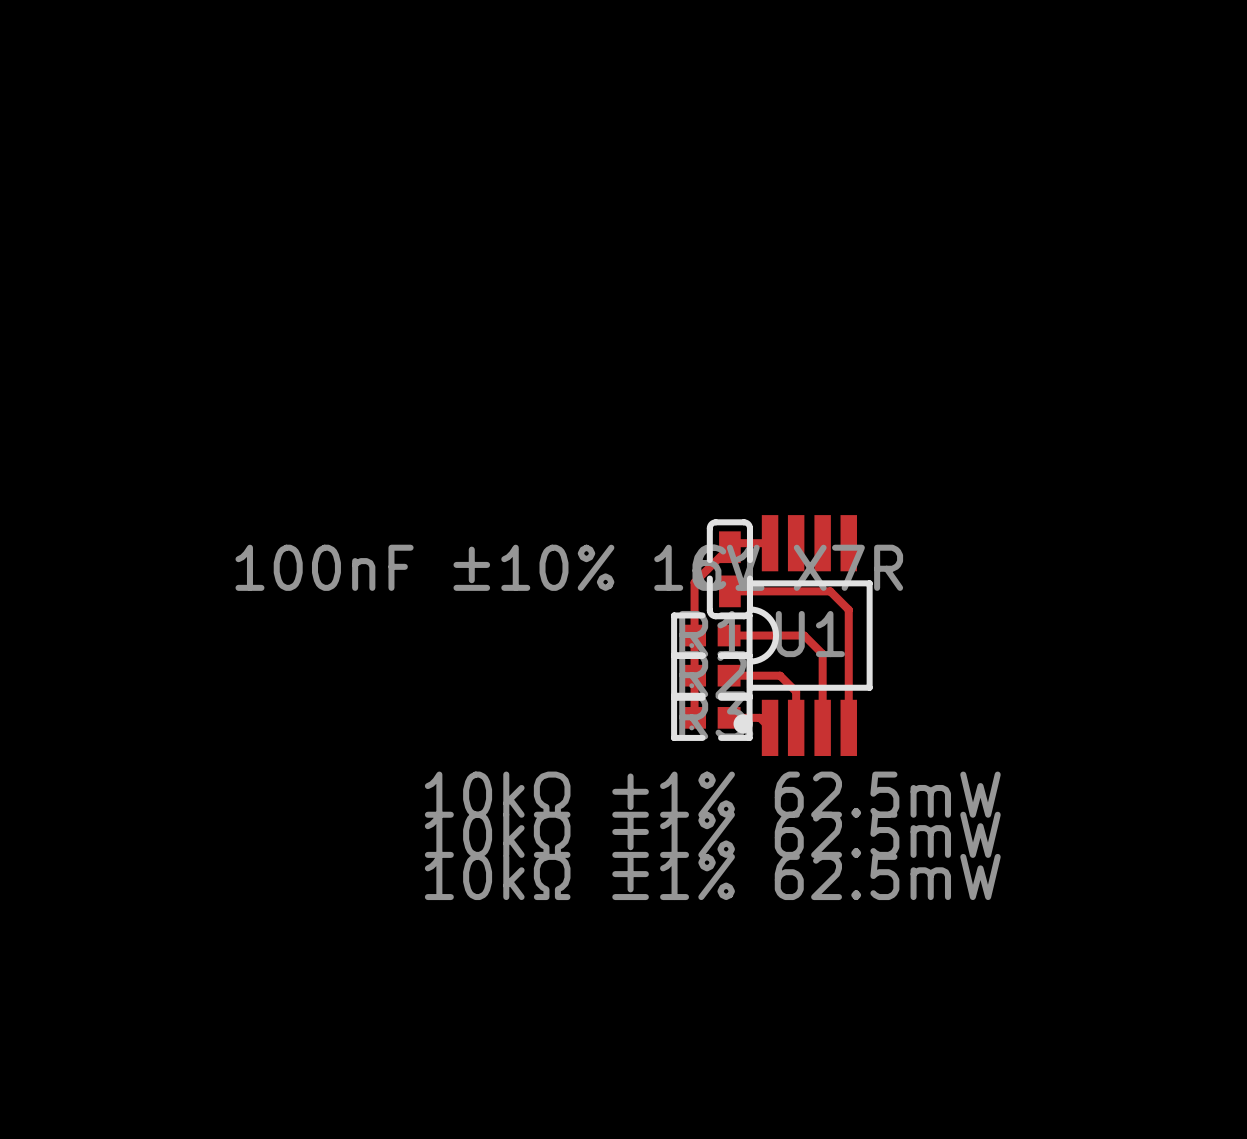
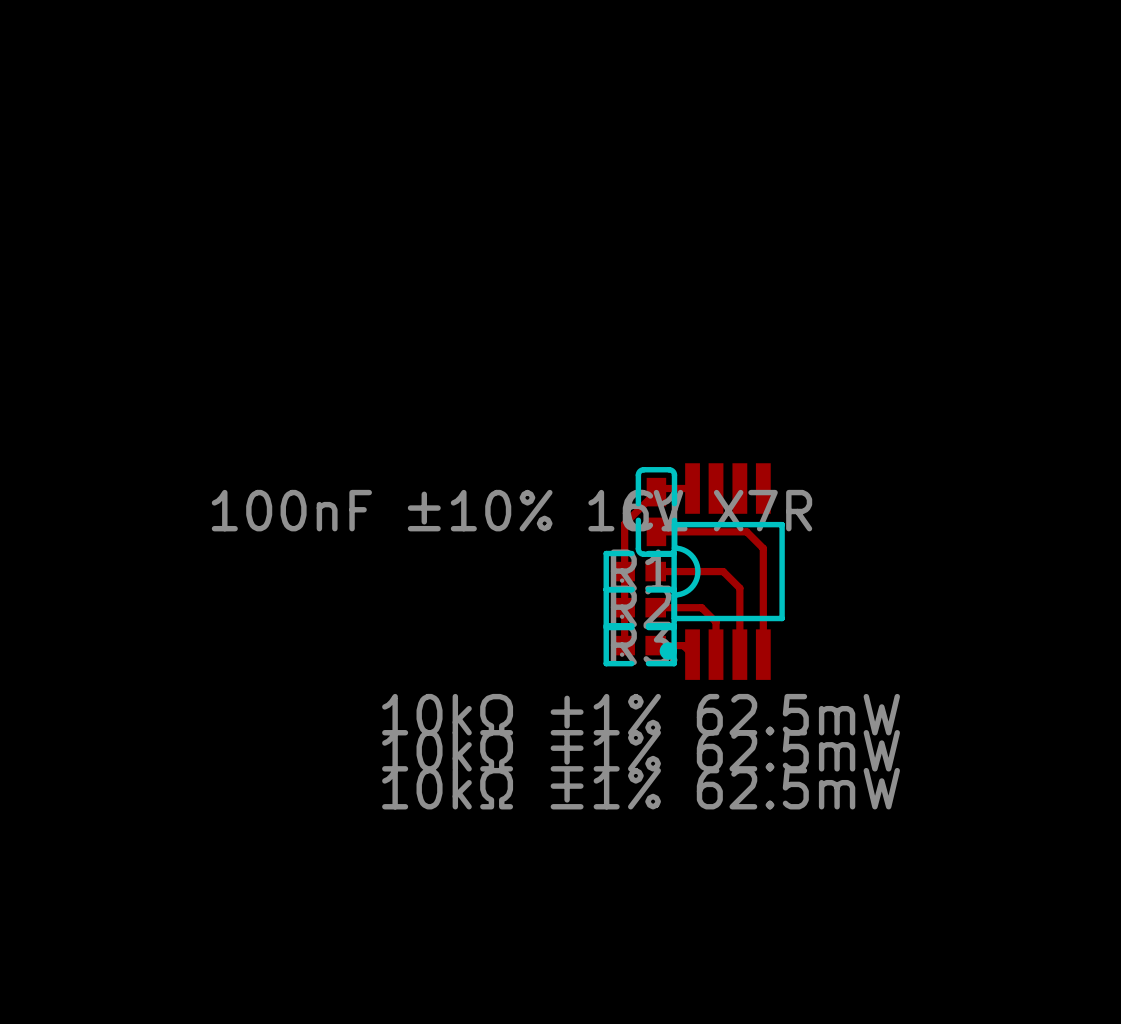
U1 name: U1 (810, 634) -> none

